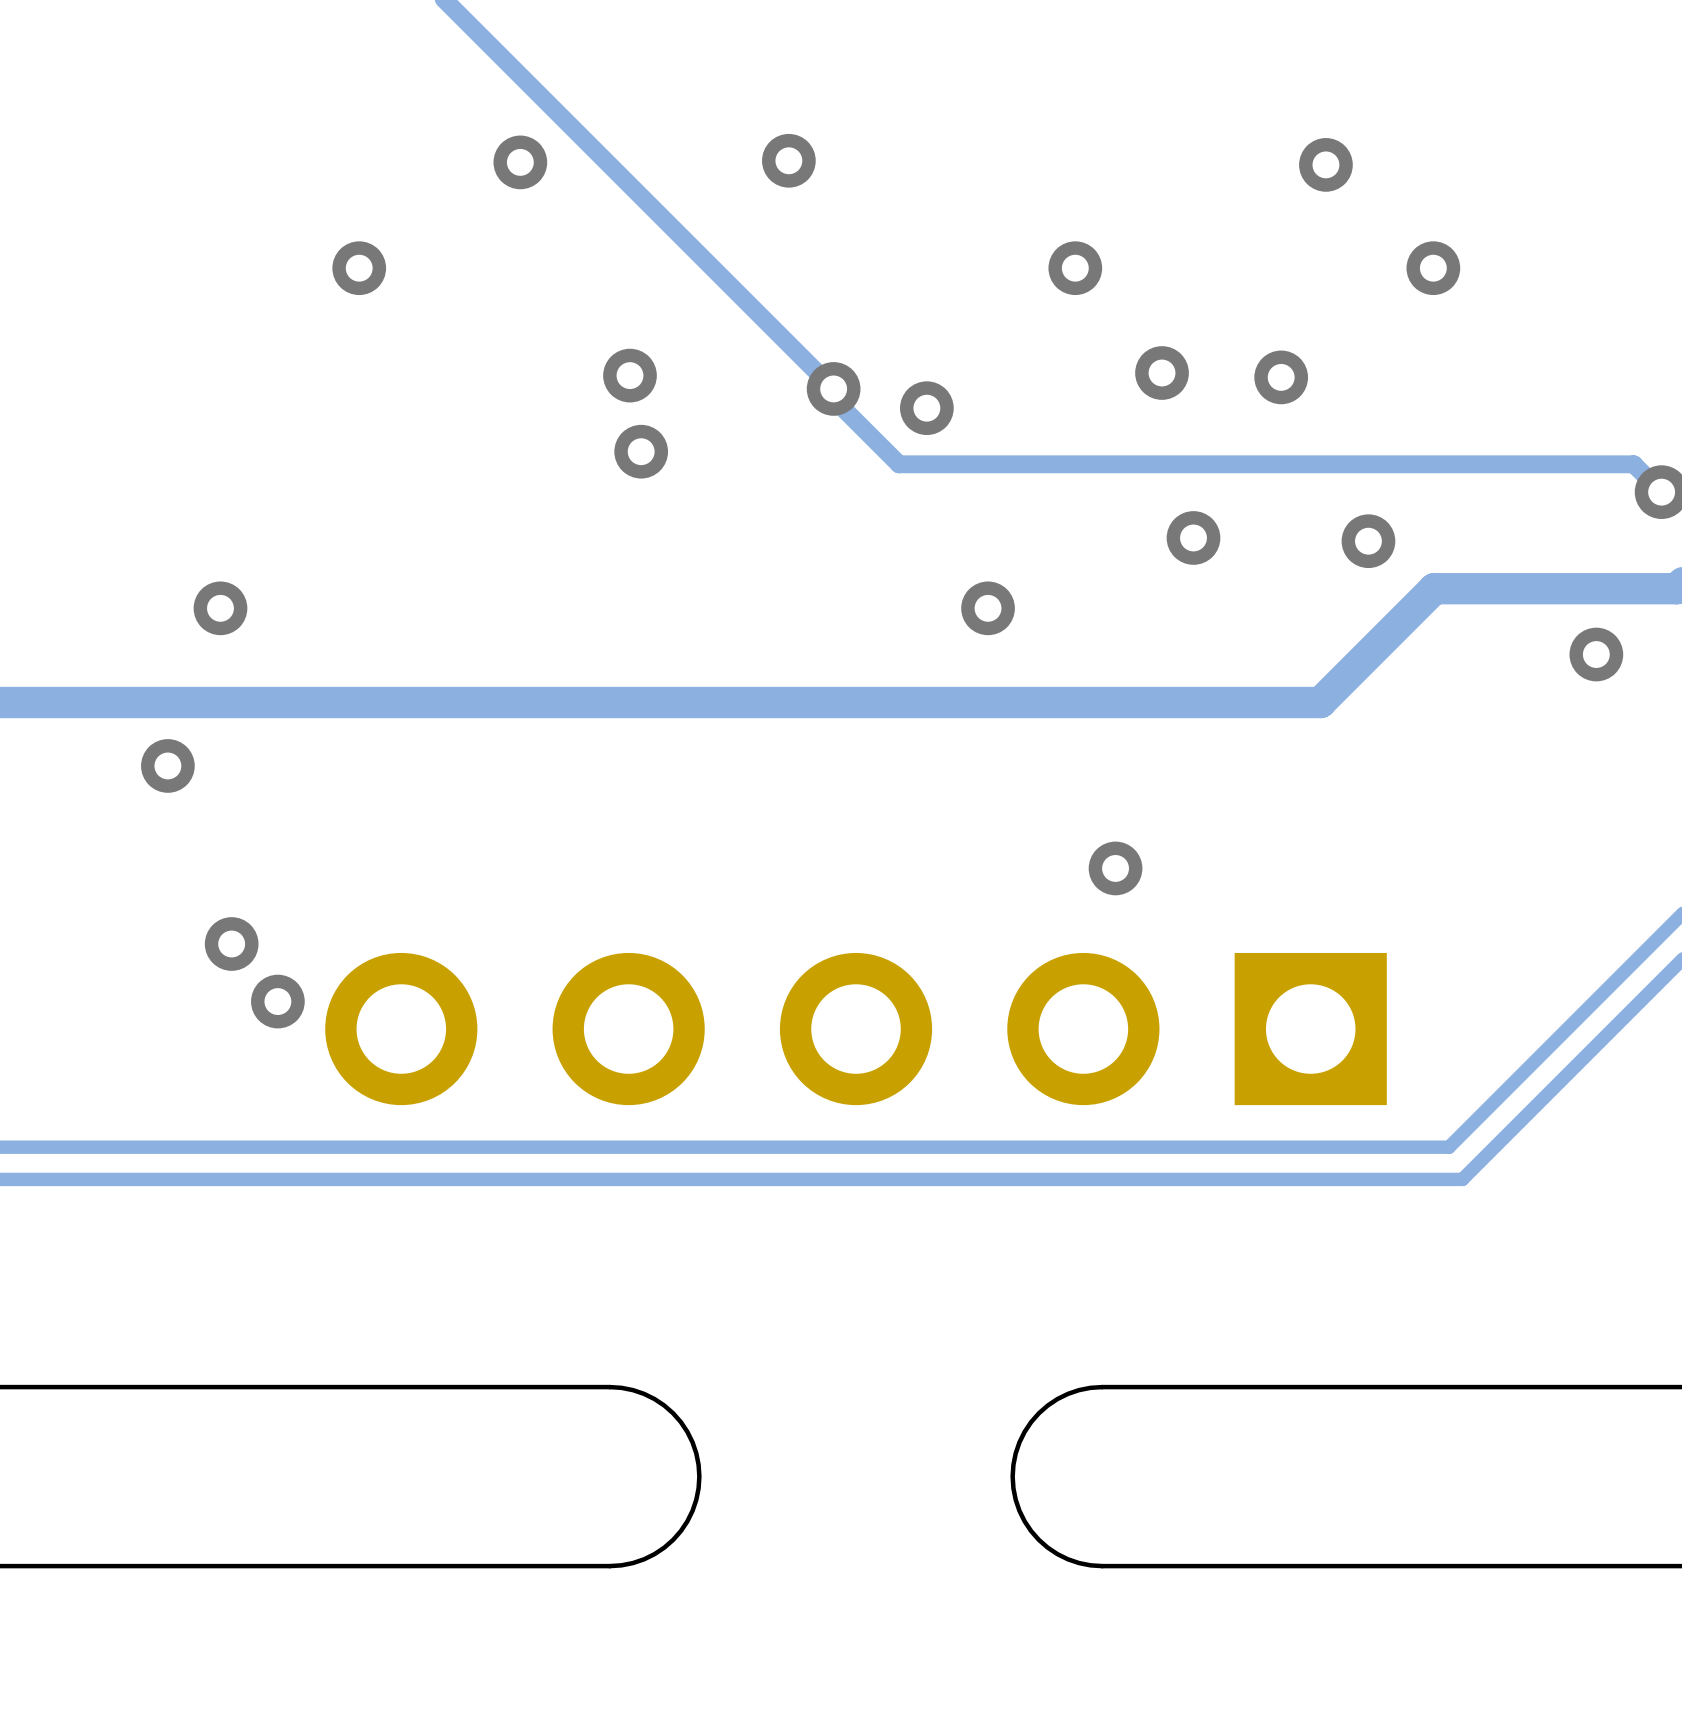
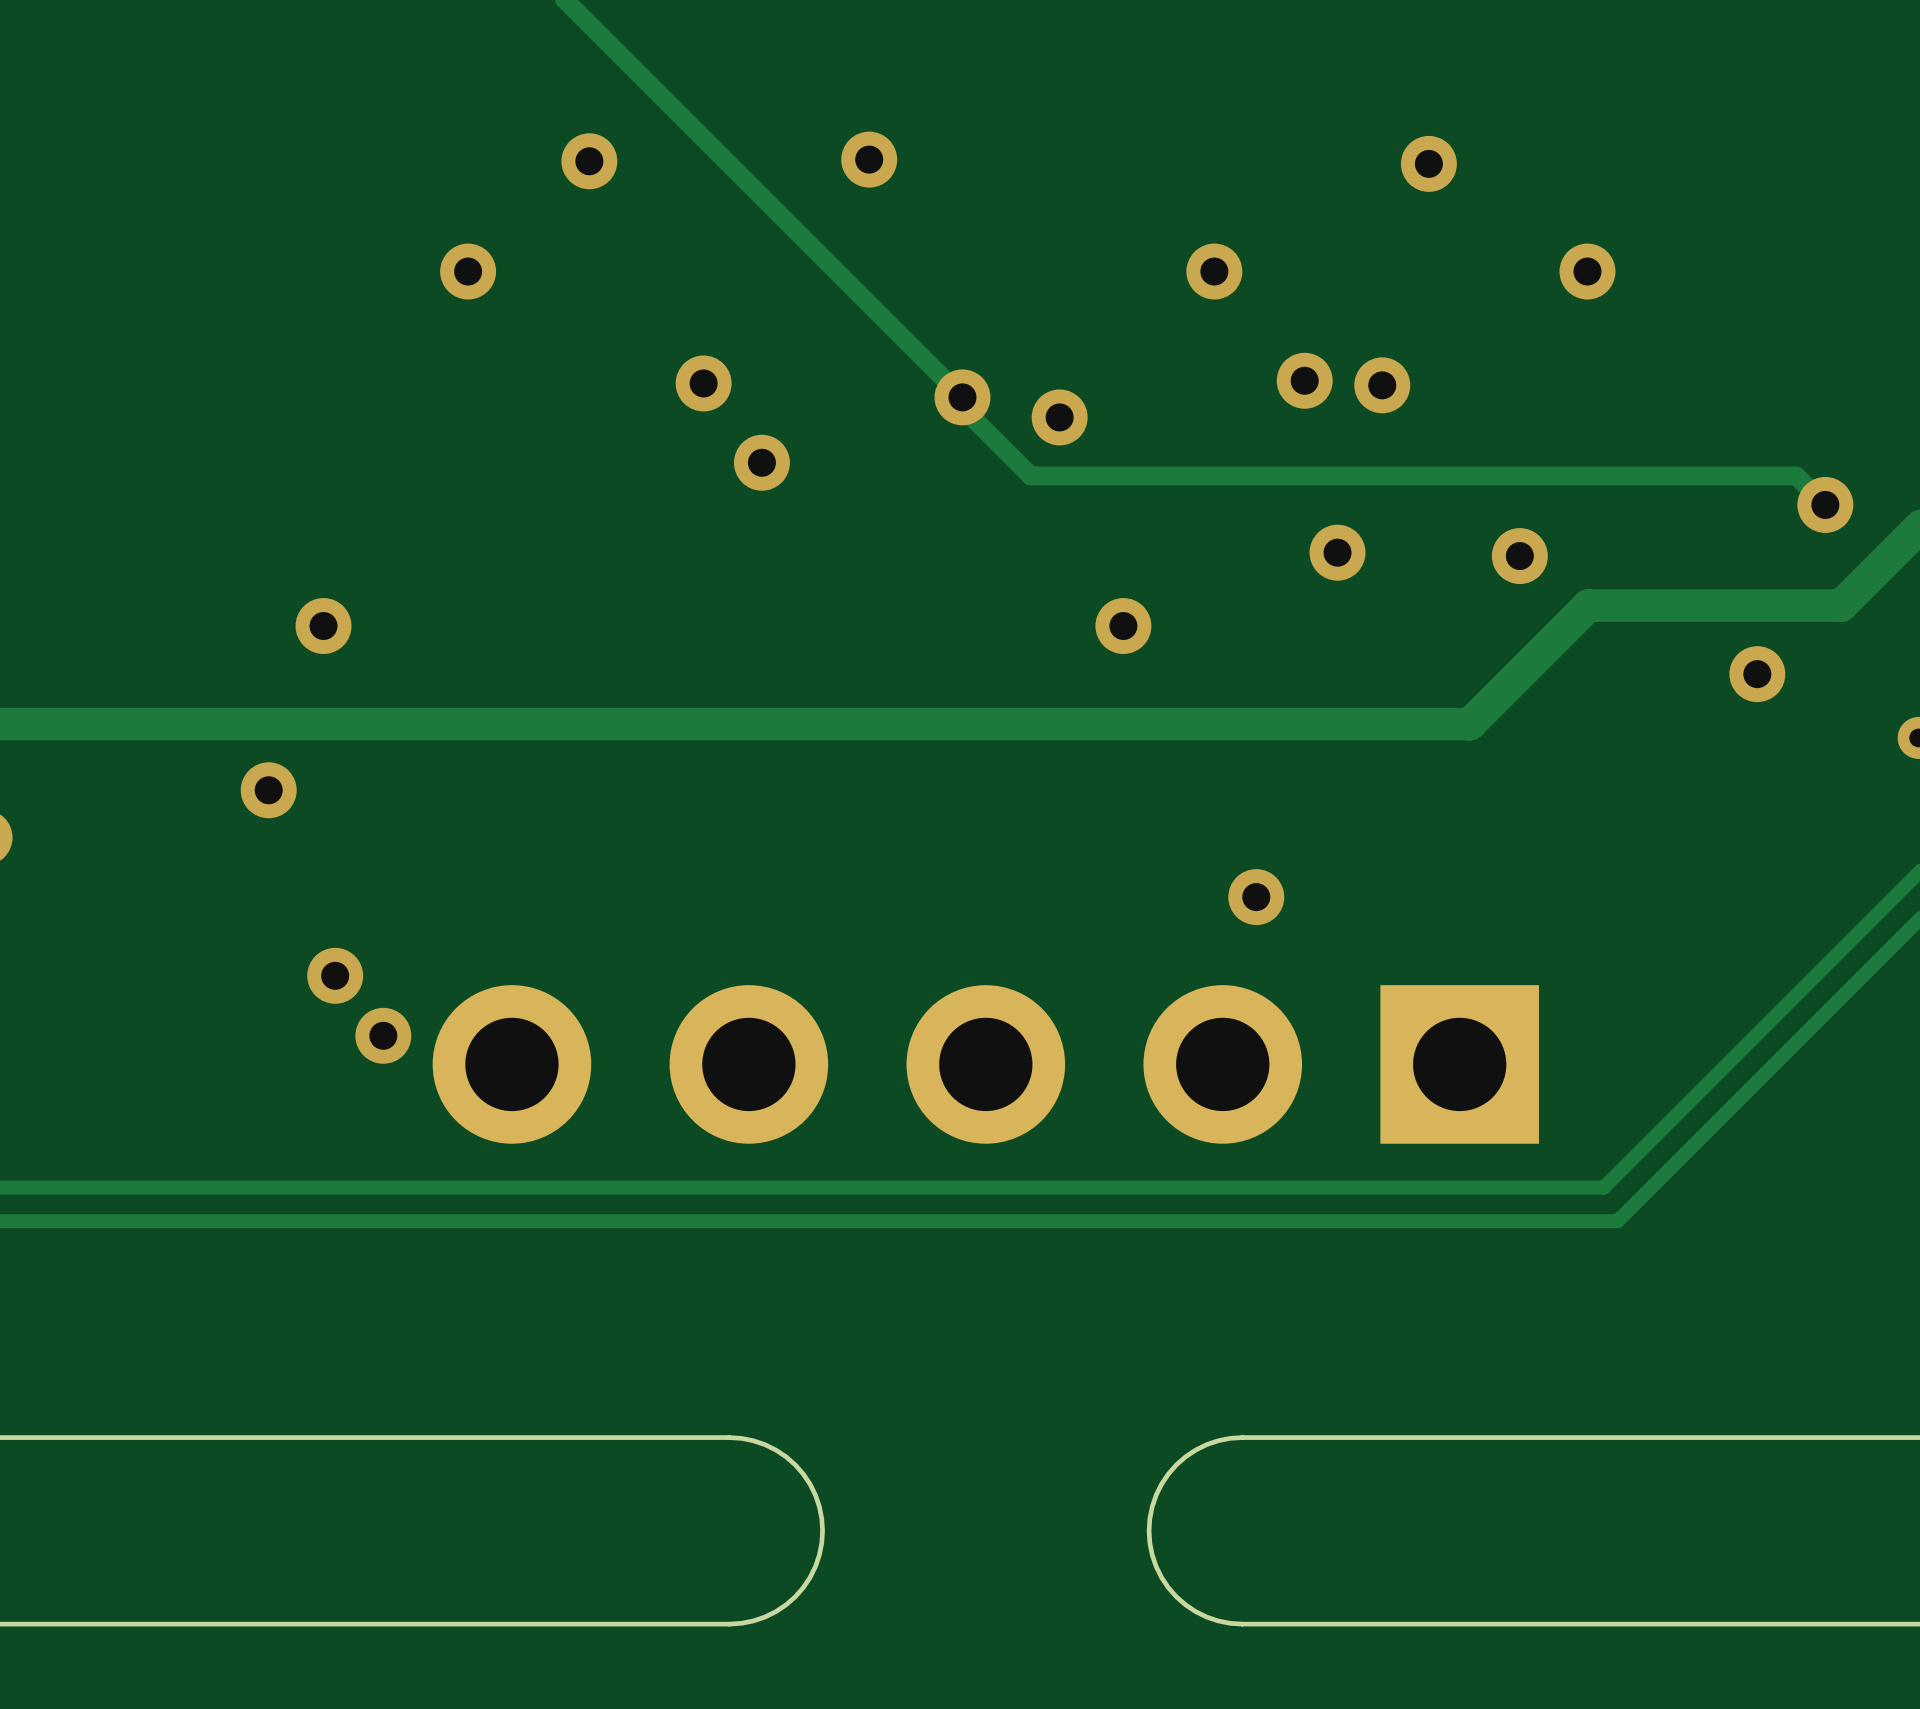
via position: (788, 160) -> (869, 159)
via position: (520, 162) -> (589, 161)
via position: (1325, 164) -> (1428, 163)
via position: (629, 375) -> (703, 383)
via position: (1281, 377) -> (1382, 385)

